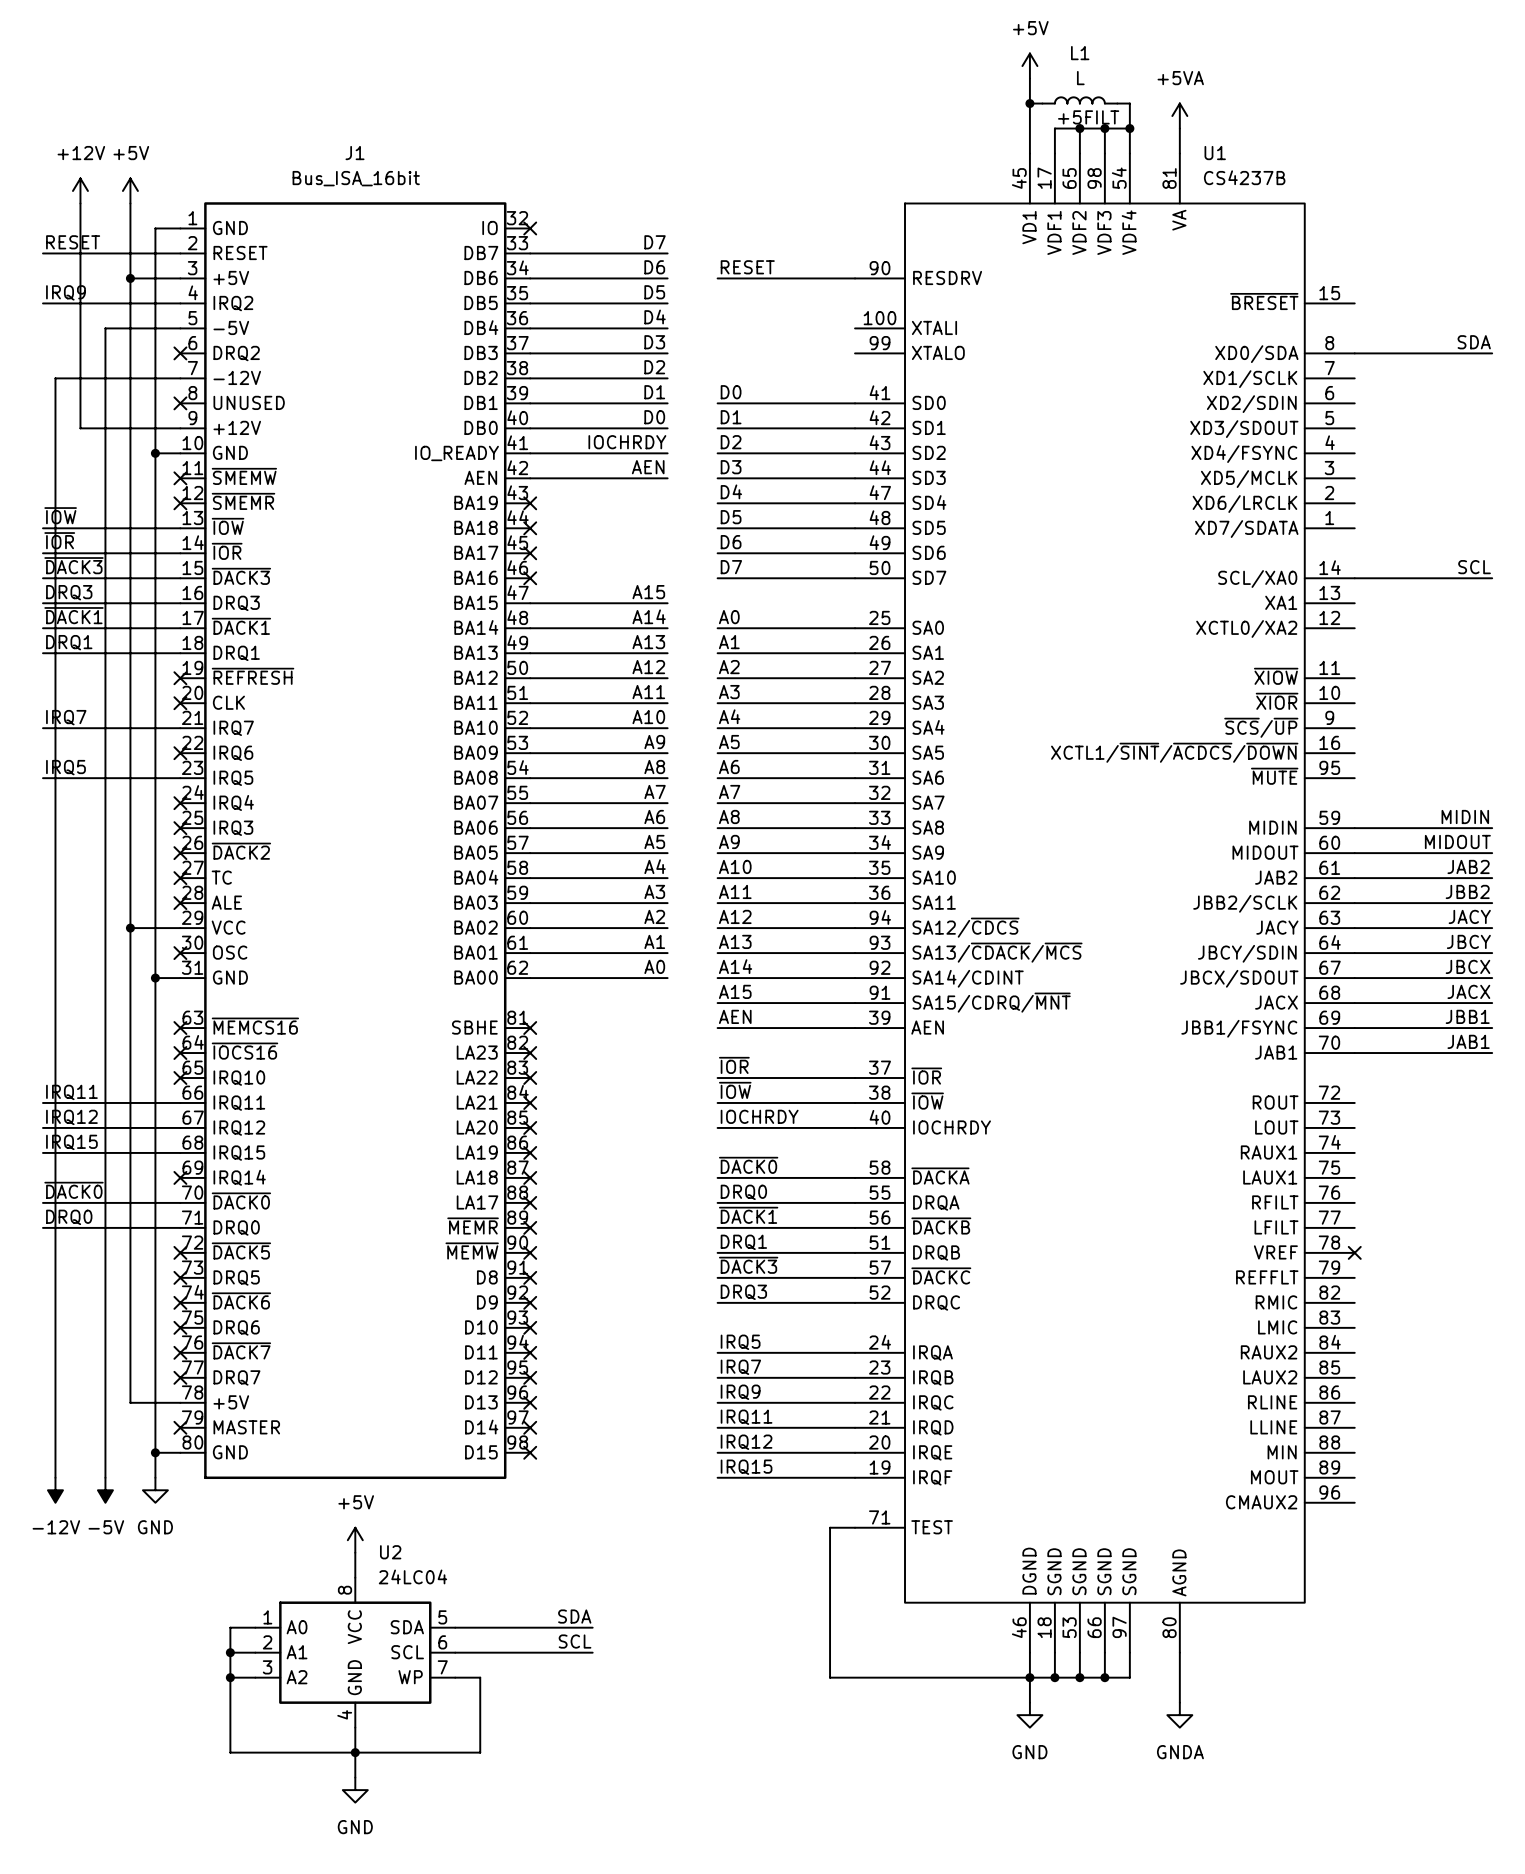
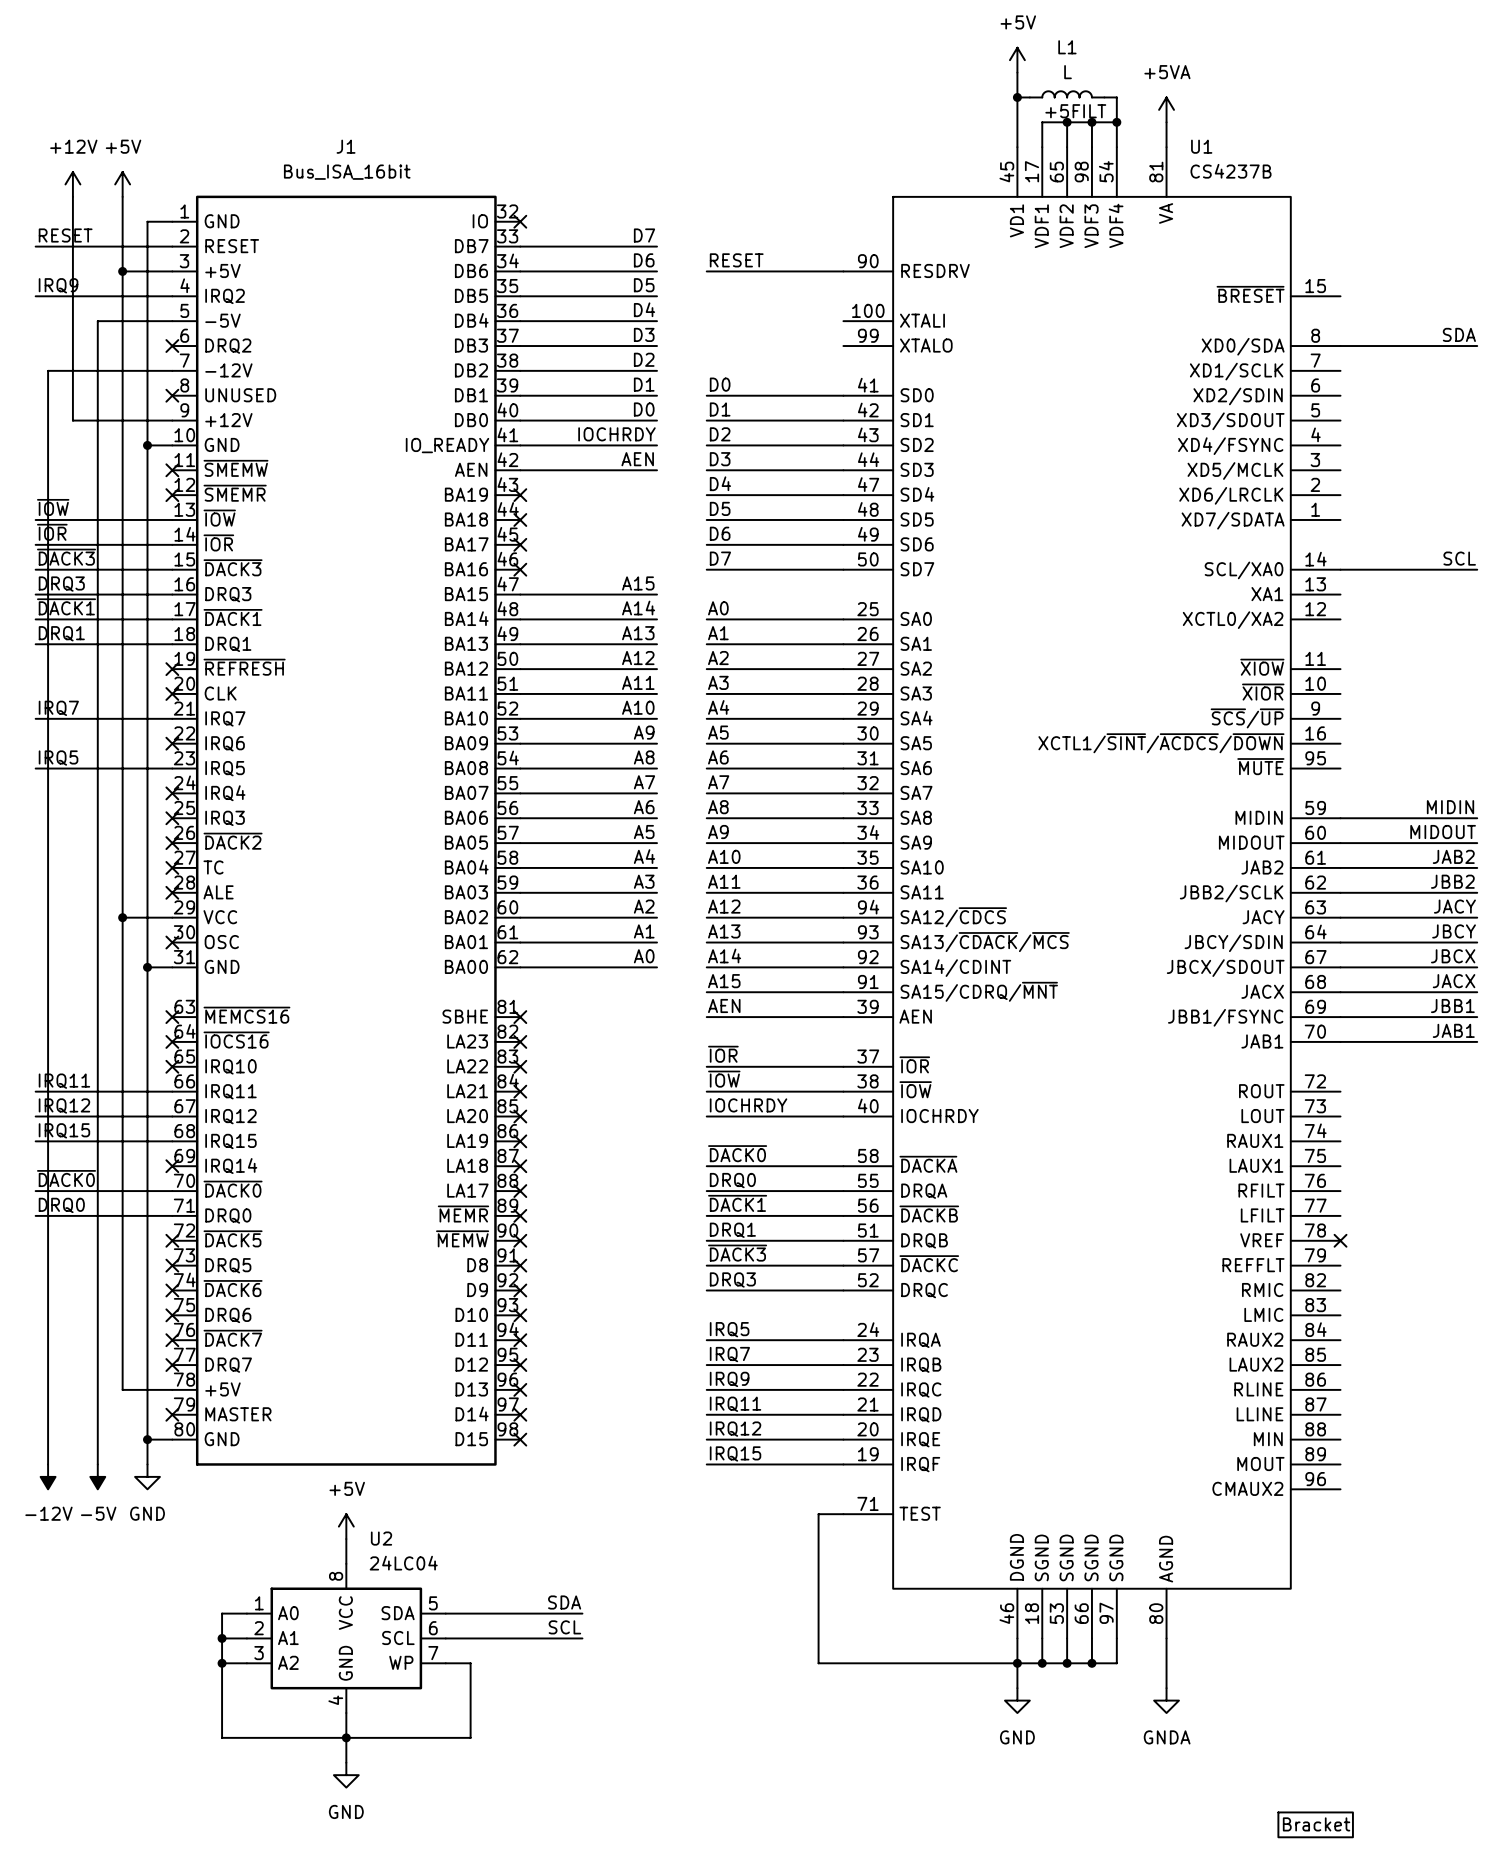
part: none -> (1315, 1824)

